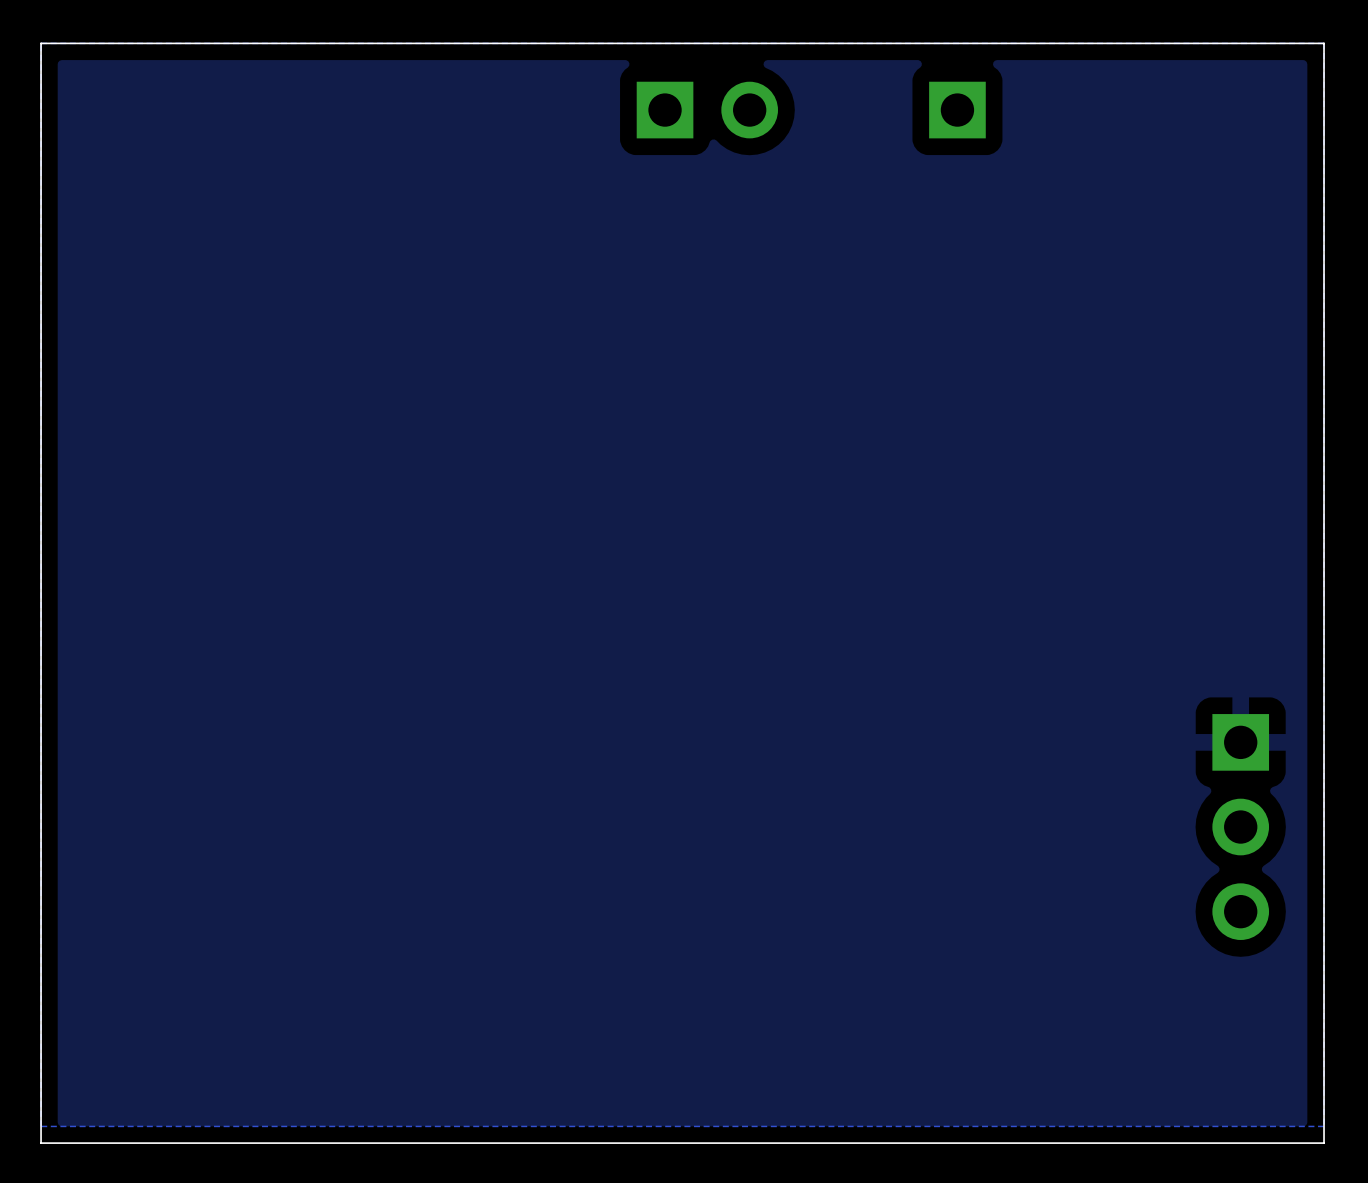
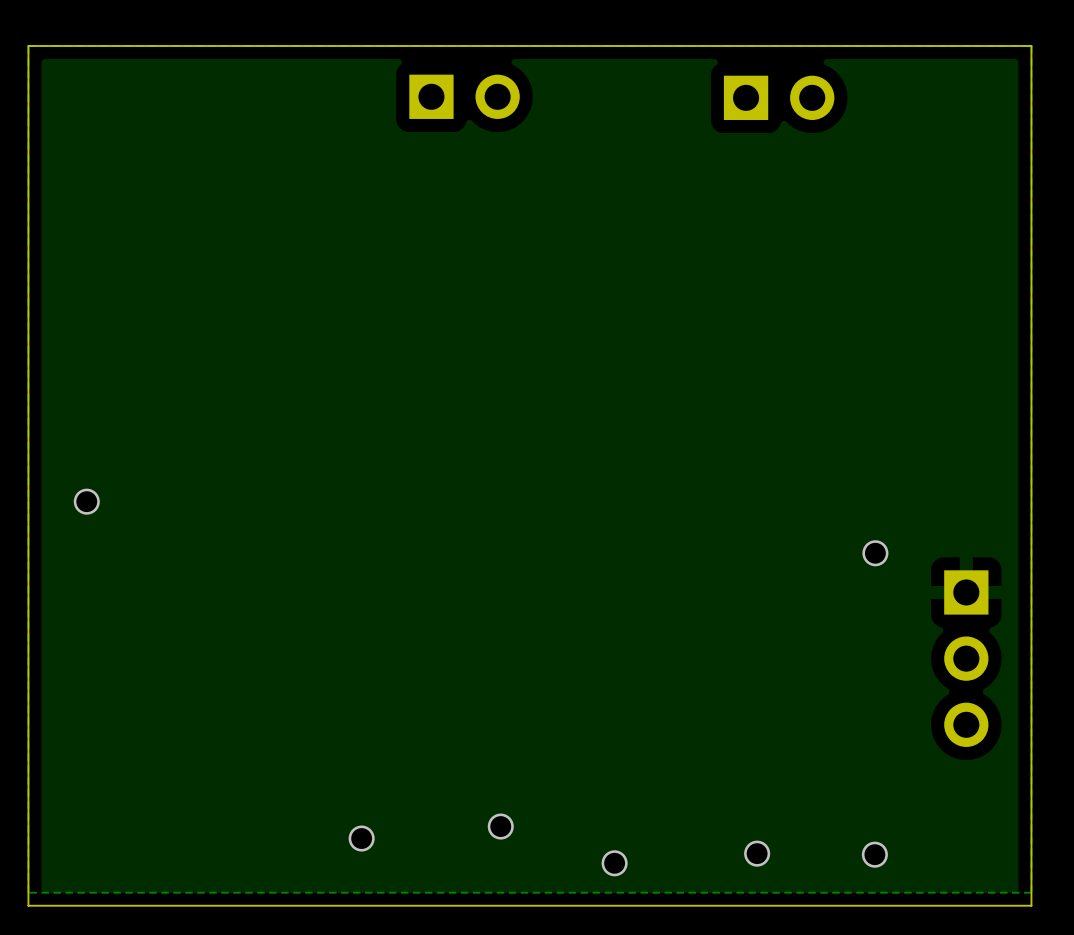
part: none -> (779, 97)
part position: (707, 110) -> (464, 96)
part: (957, 110) -> none
via: none -> (86, 501)
via: none -> (875, 553)
via: none -> (500, 826)
via: none -> (361, 838)
via: none -> (757, 853)
via: none -> (874, 854)
via: none -> (614, 863)

